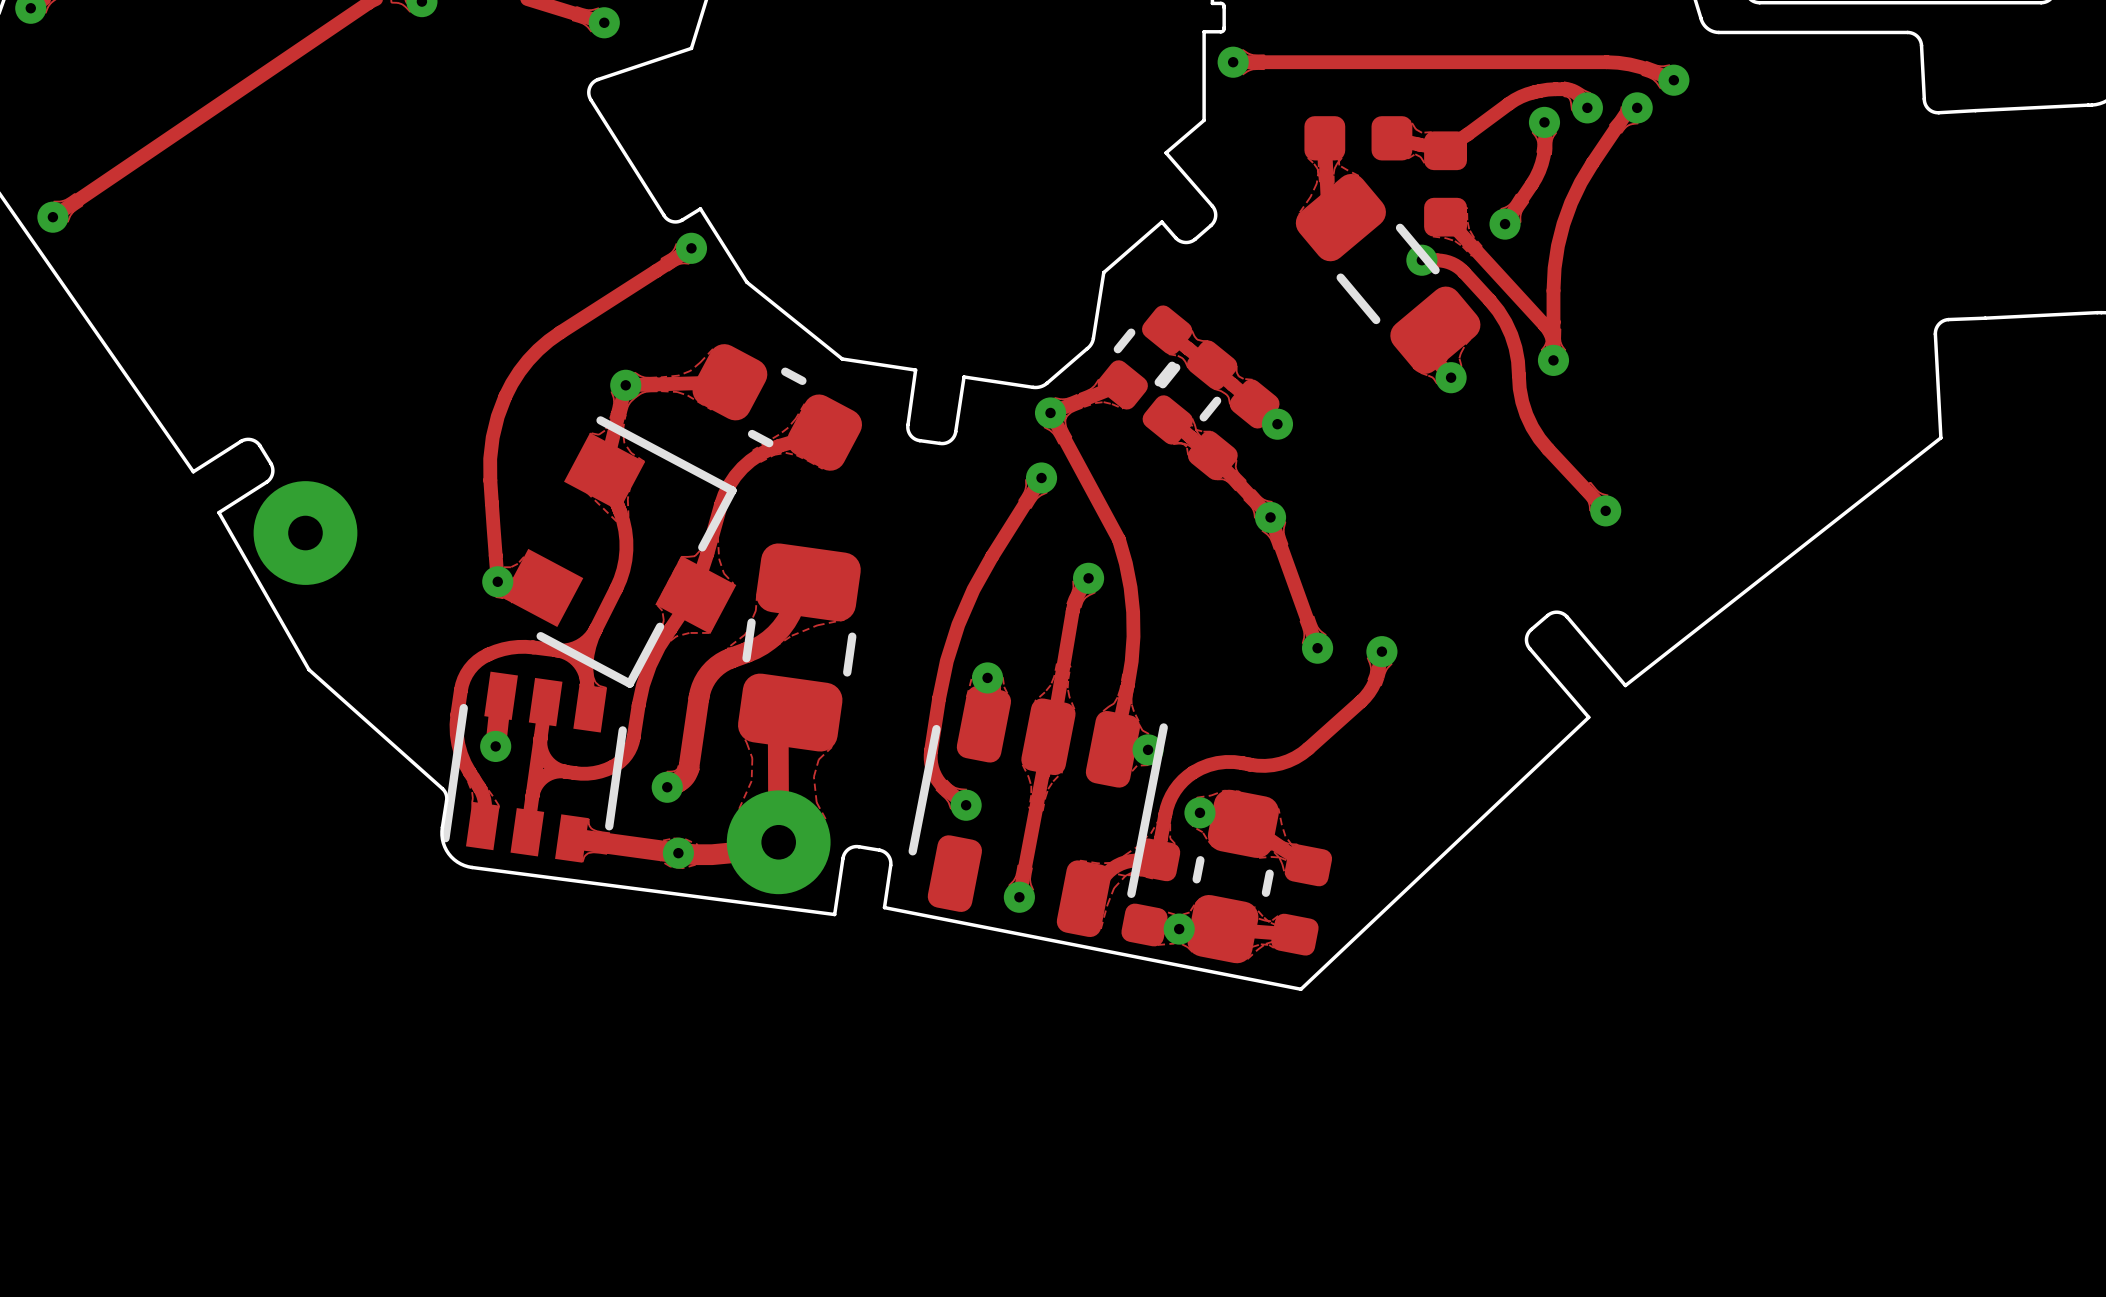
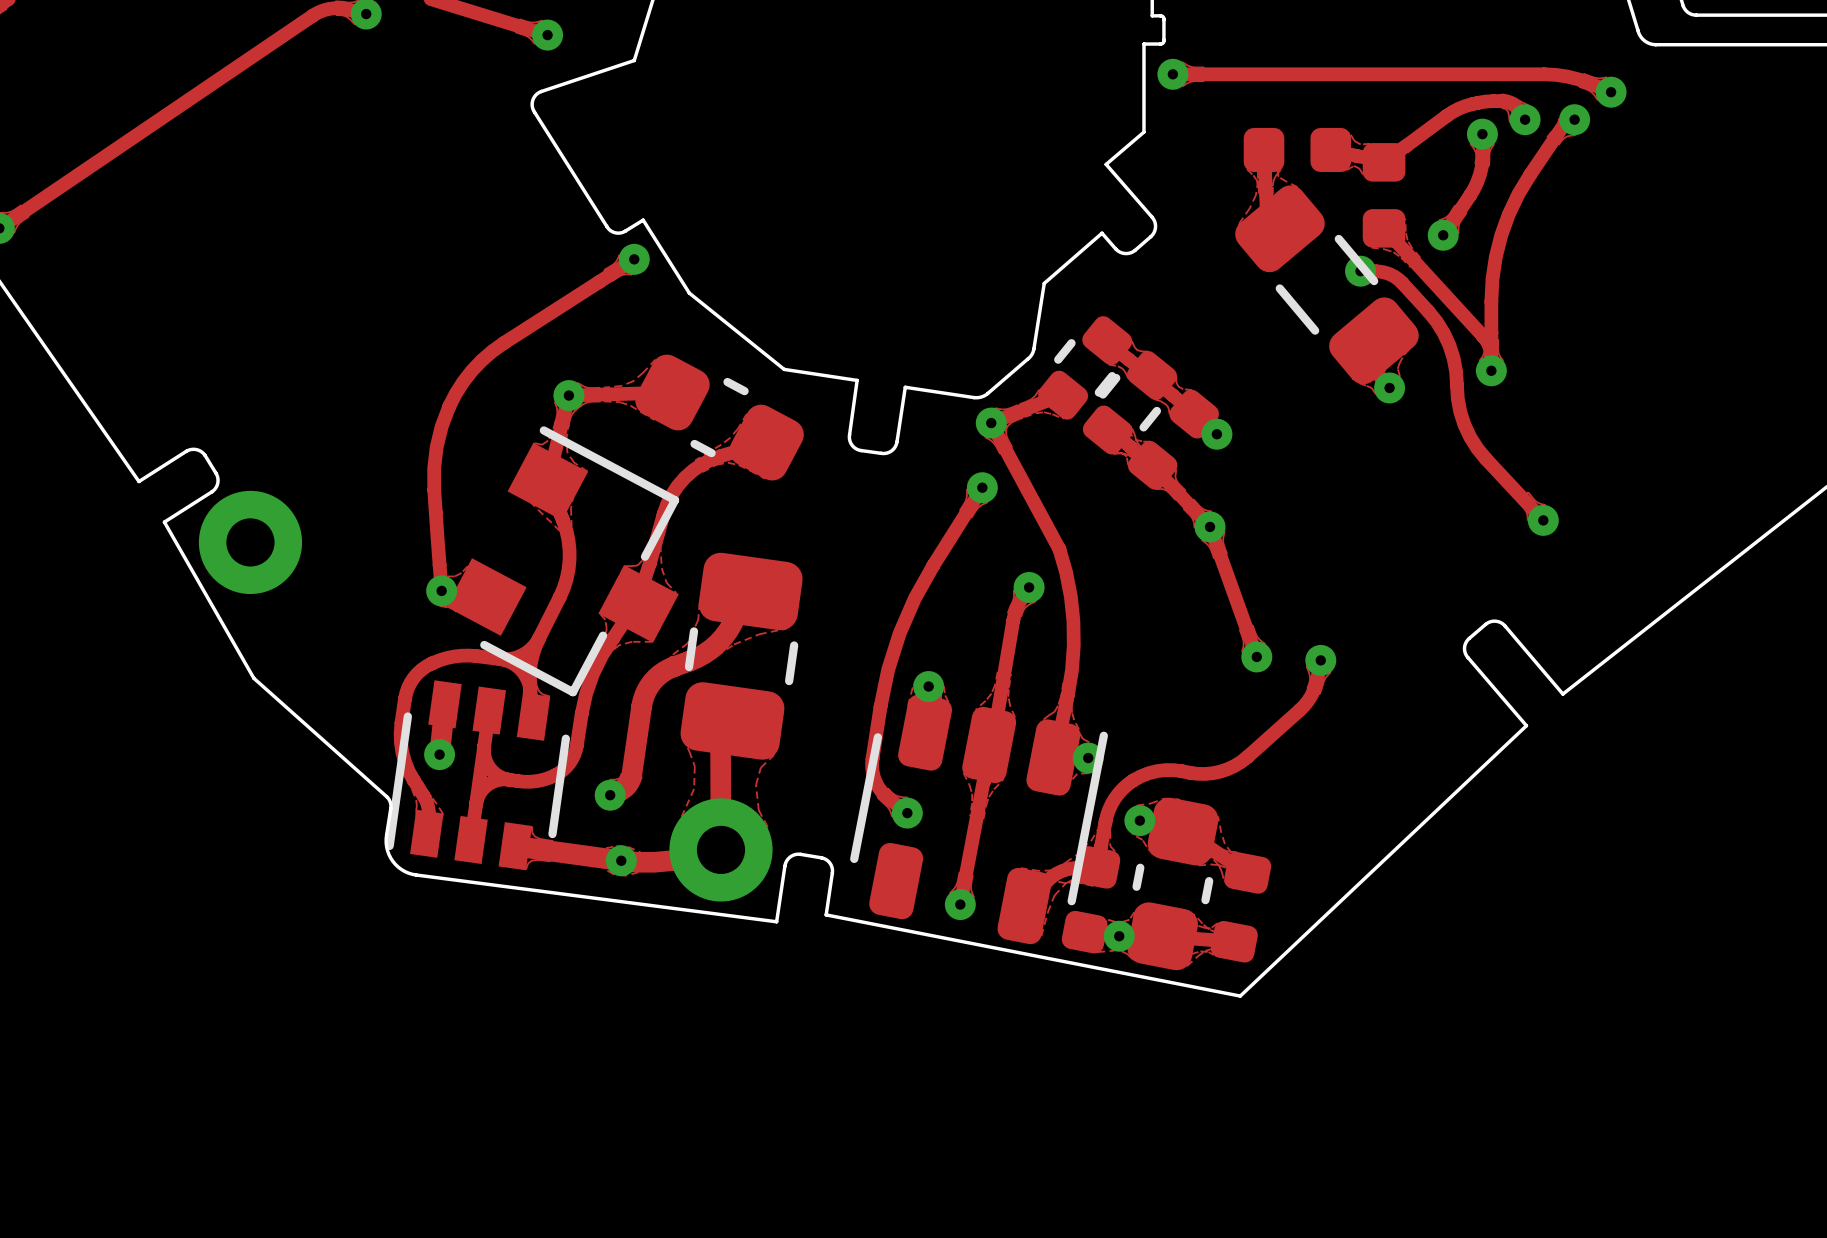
part footprint: [253, 481, 358, 585] -> [198, 490, 303, 595]
part footprint: [726, 790, 831, 895] -> [669, 798, 773, 902]

